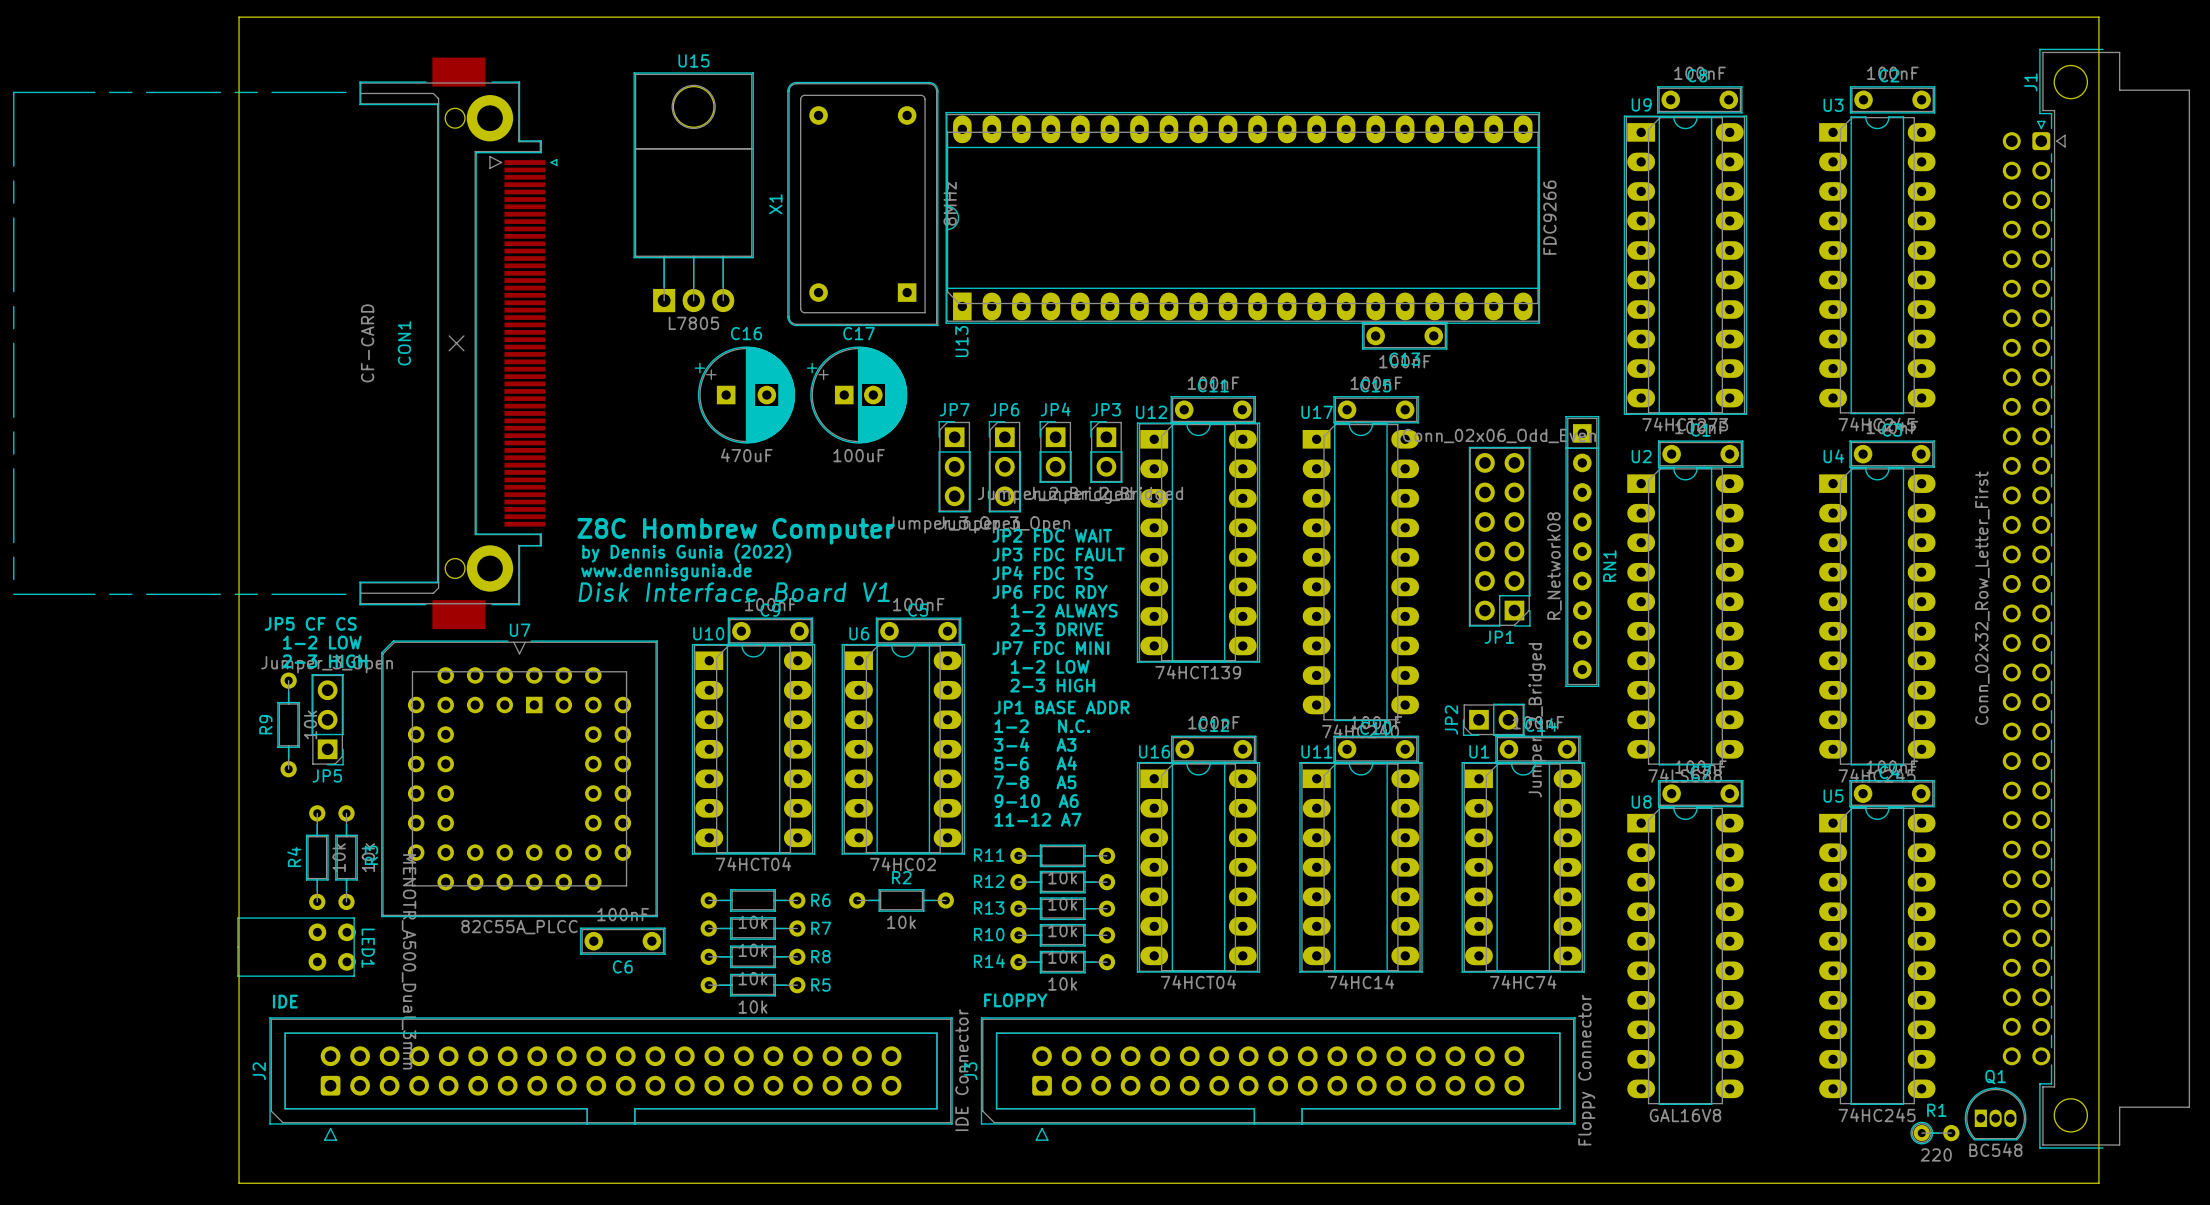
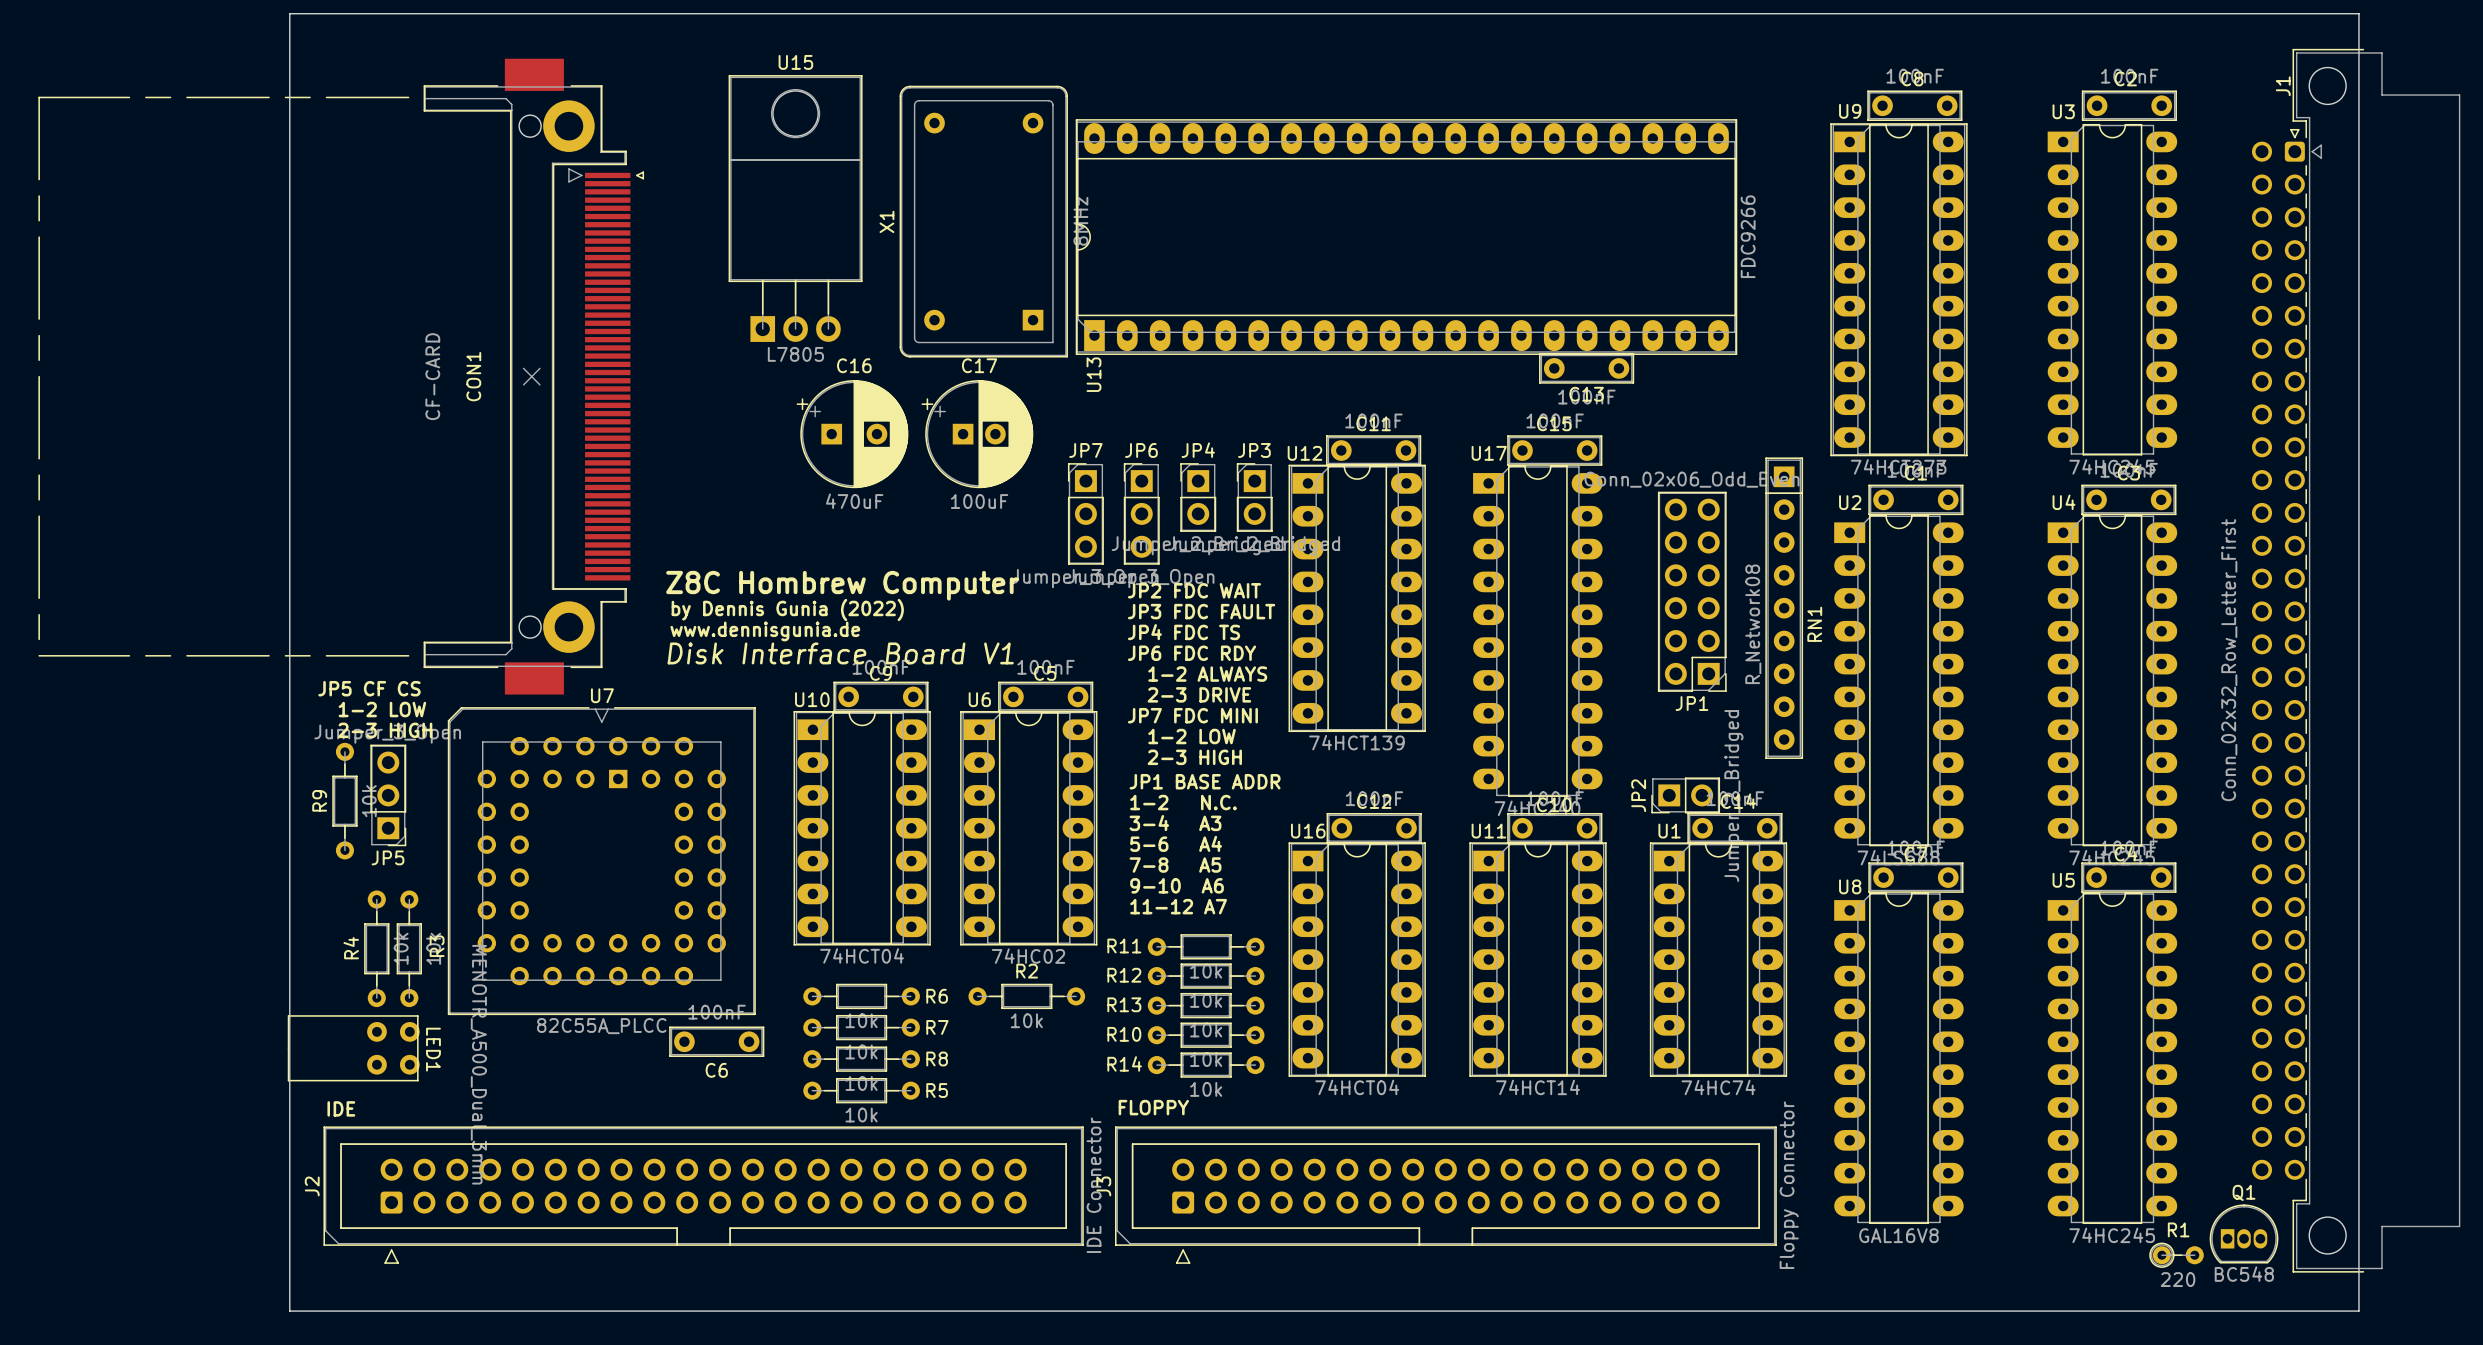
U11 value: 74HC14 (1361, 982) -> 74HCT14 (1537, 1087)

